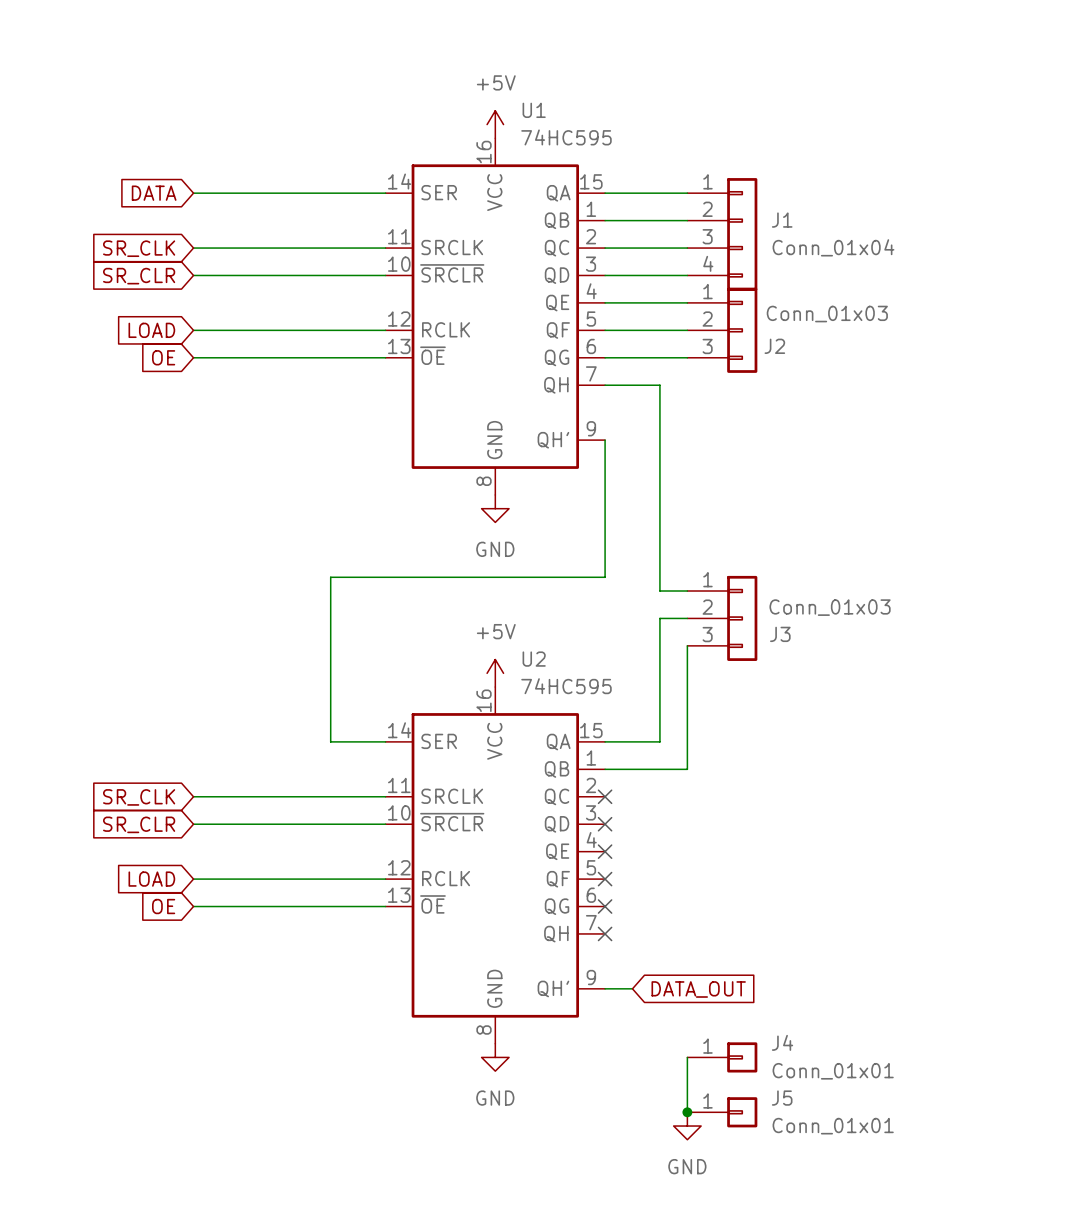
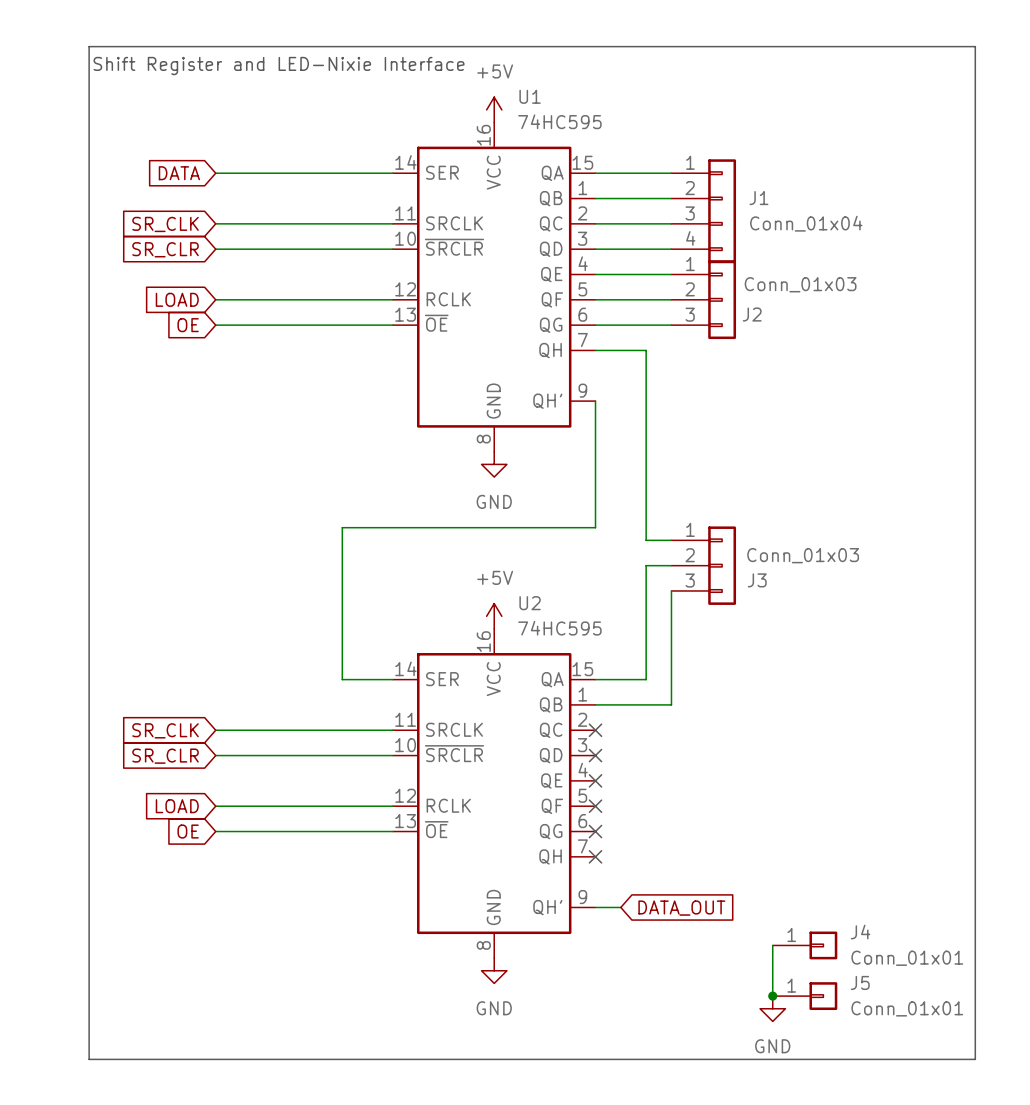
line: none -> (89, 46) (975, 46) (975, 1059) (89, 1059) (89, 46)
text: none -> Shift Register and LED-Nixie Interface (279, 66)
wire: (687, 1057) (687, 1112) -> (772, 945) (772, 996)
J4 position: (722, 1057) -> (805, 945)
junction: none -> (772, 996)
junction: (687, 1112) -> none
J5 position: (722, 1112) -> (805, 996)
power symbol position: GND (687, 1126) -> GND (772, 1008)

